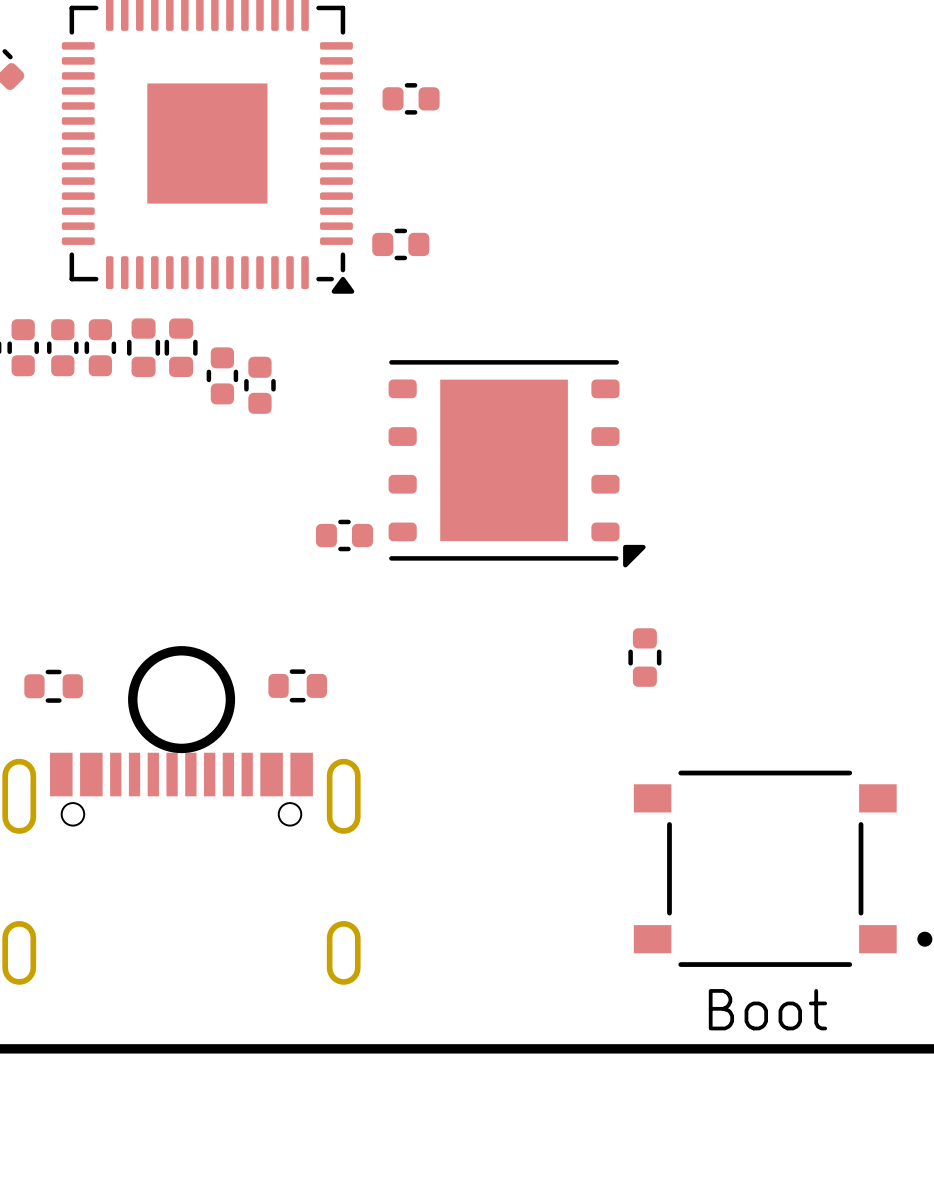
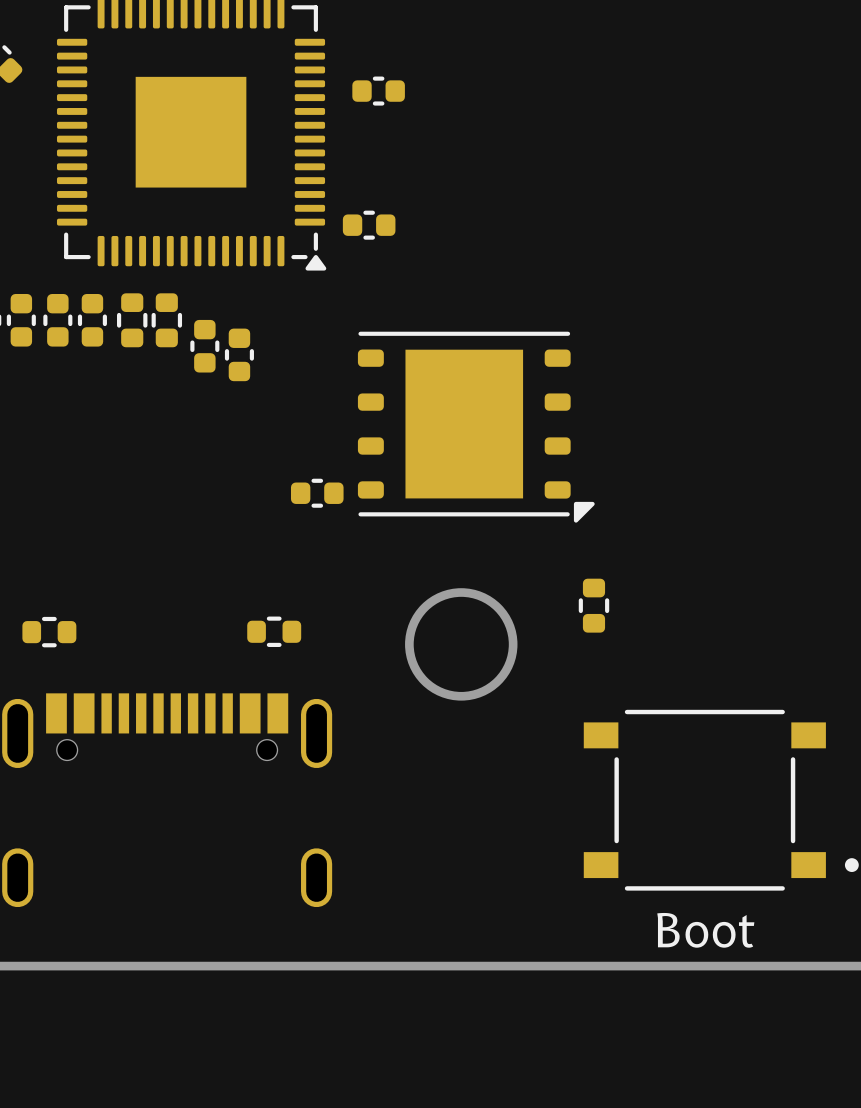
round board edge: none -> [405, 588, 518, 701]
round board edge: [128, 646, 236, 754] -> none

